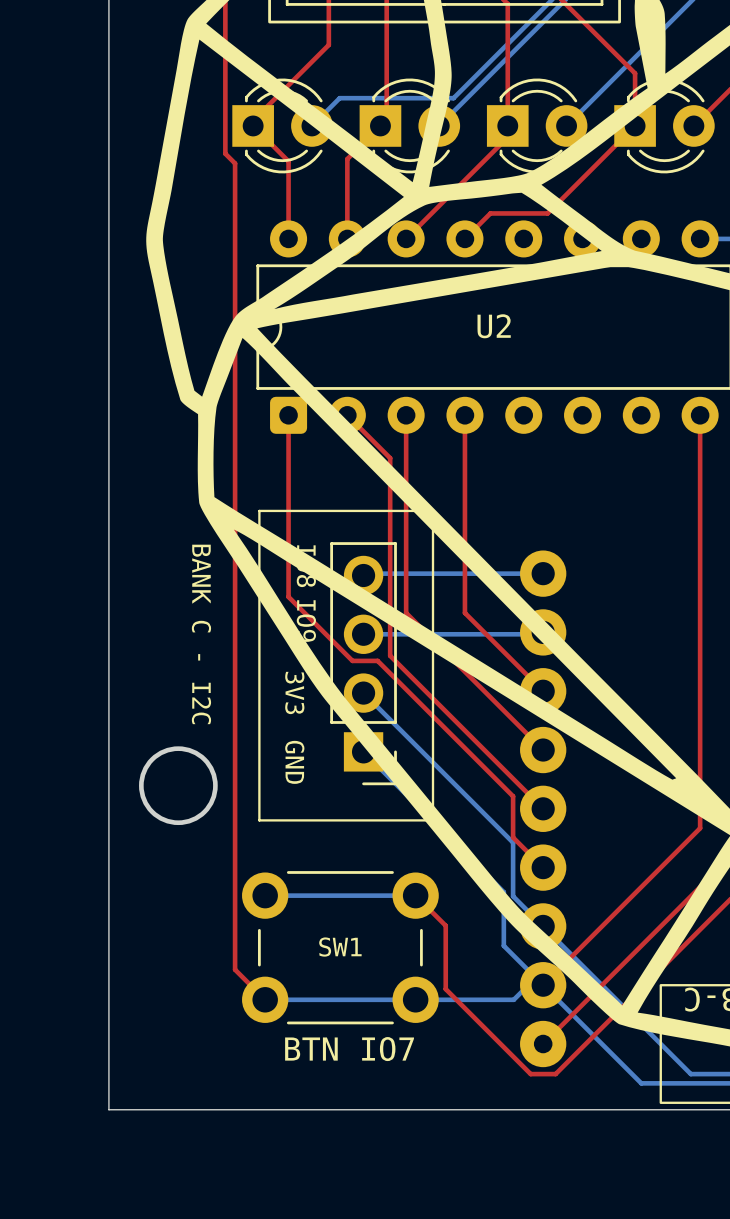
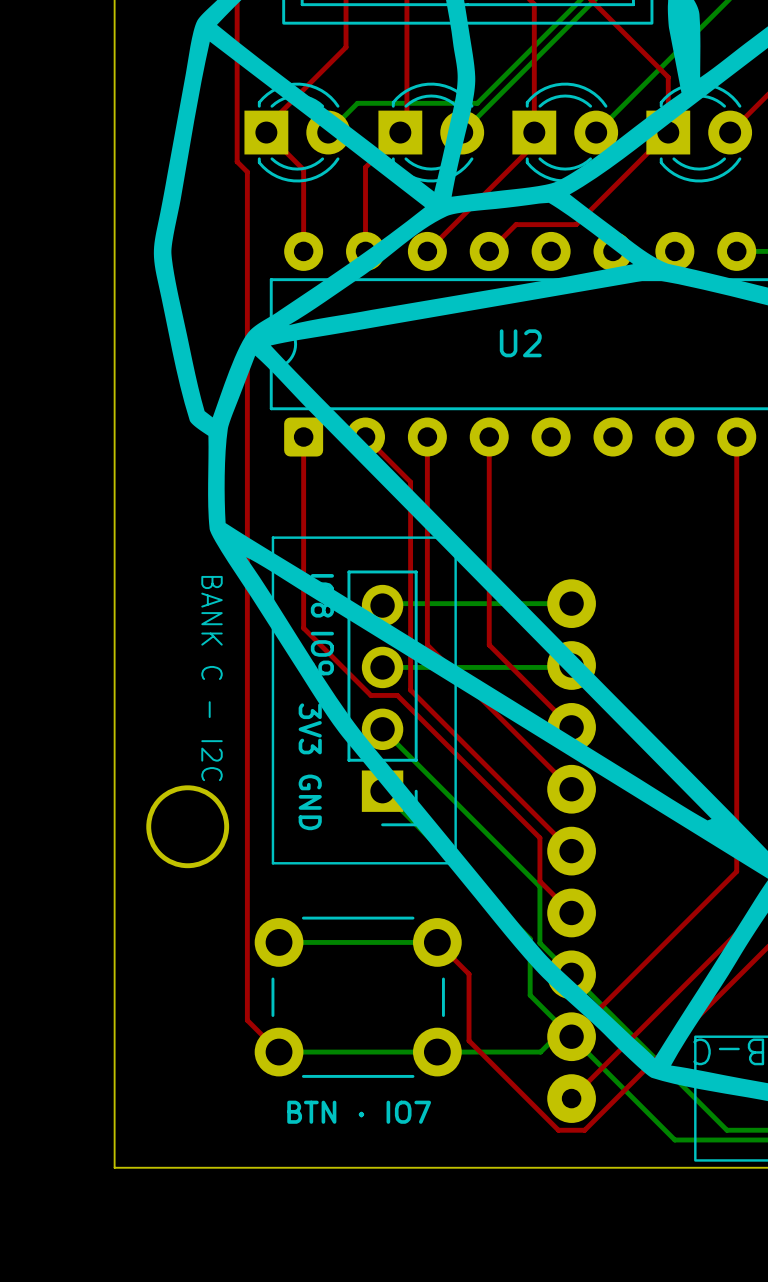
SW1 name: SW1 (340, 947) -> BTN · IO7 (359, 1112)
text: BTN IO7 (349, 1049) -> none

